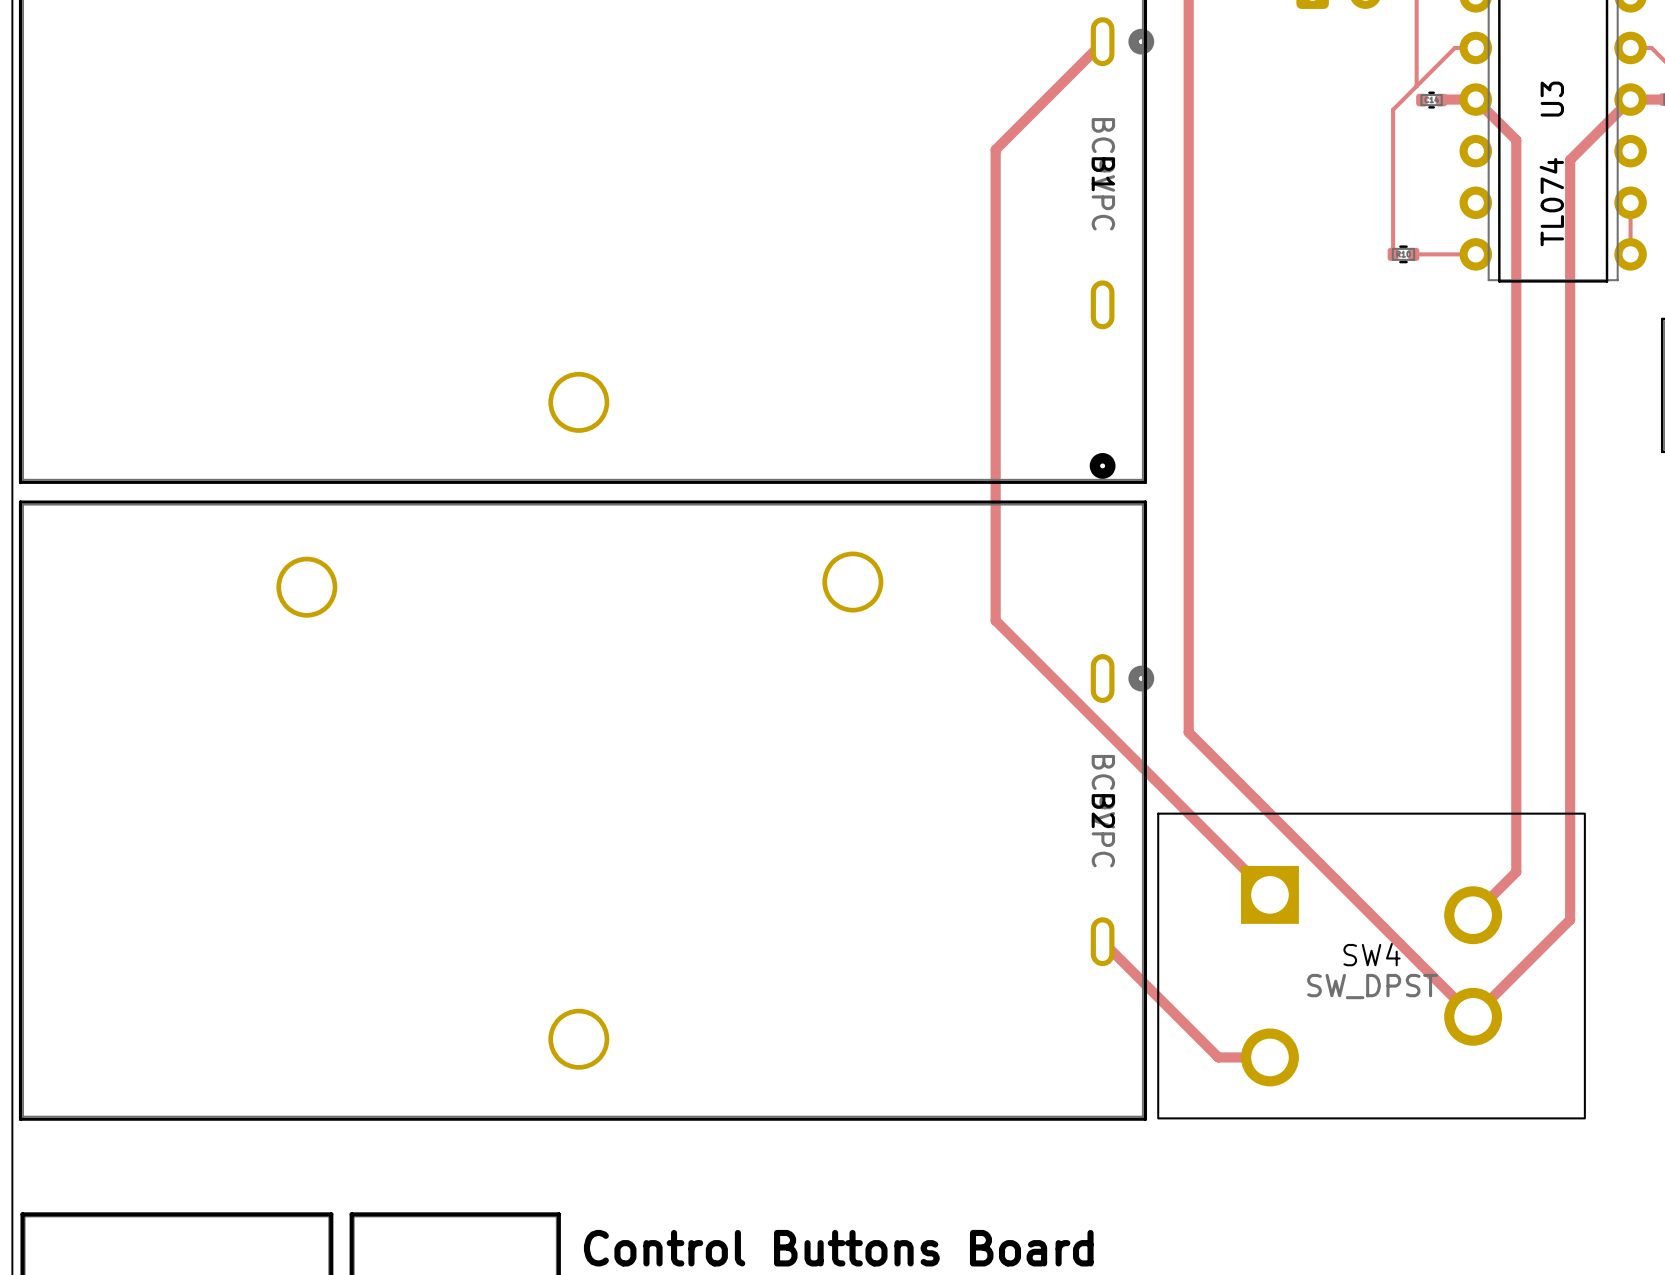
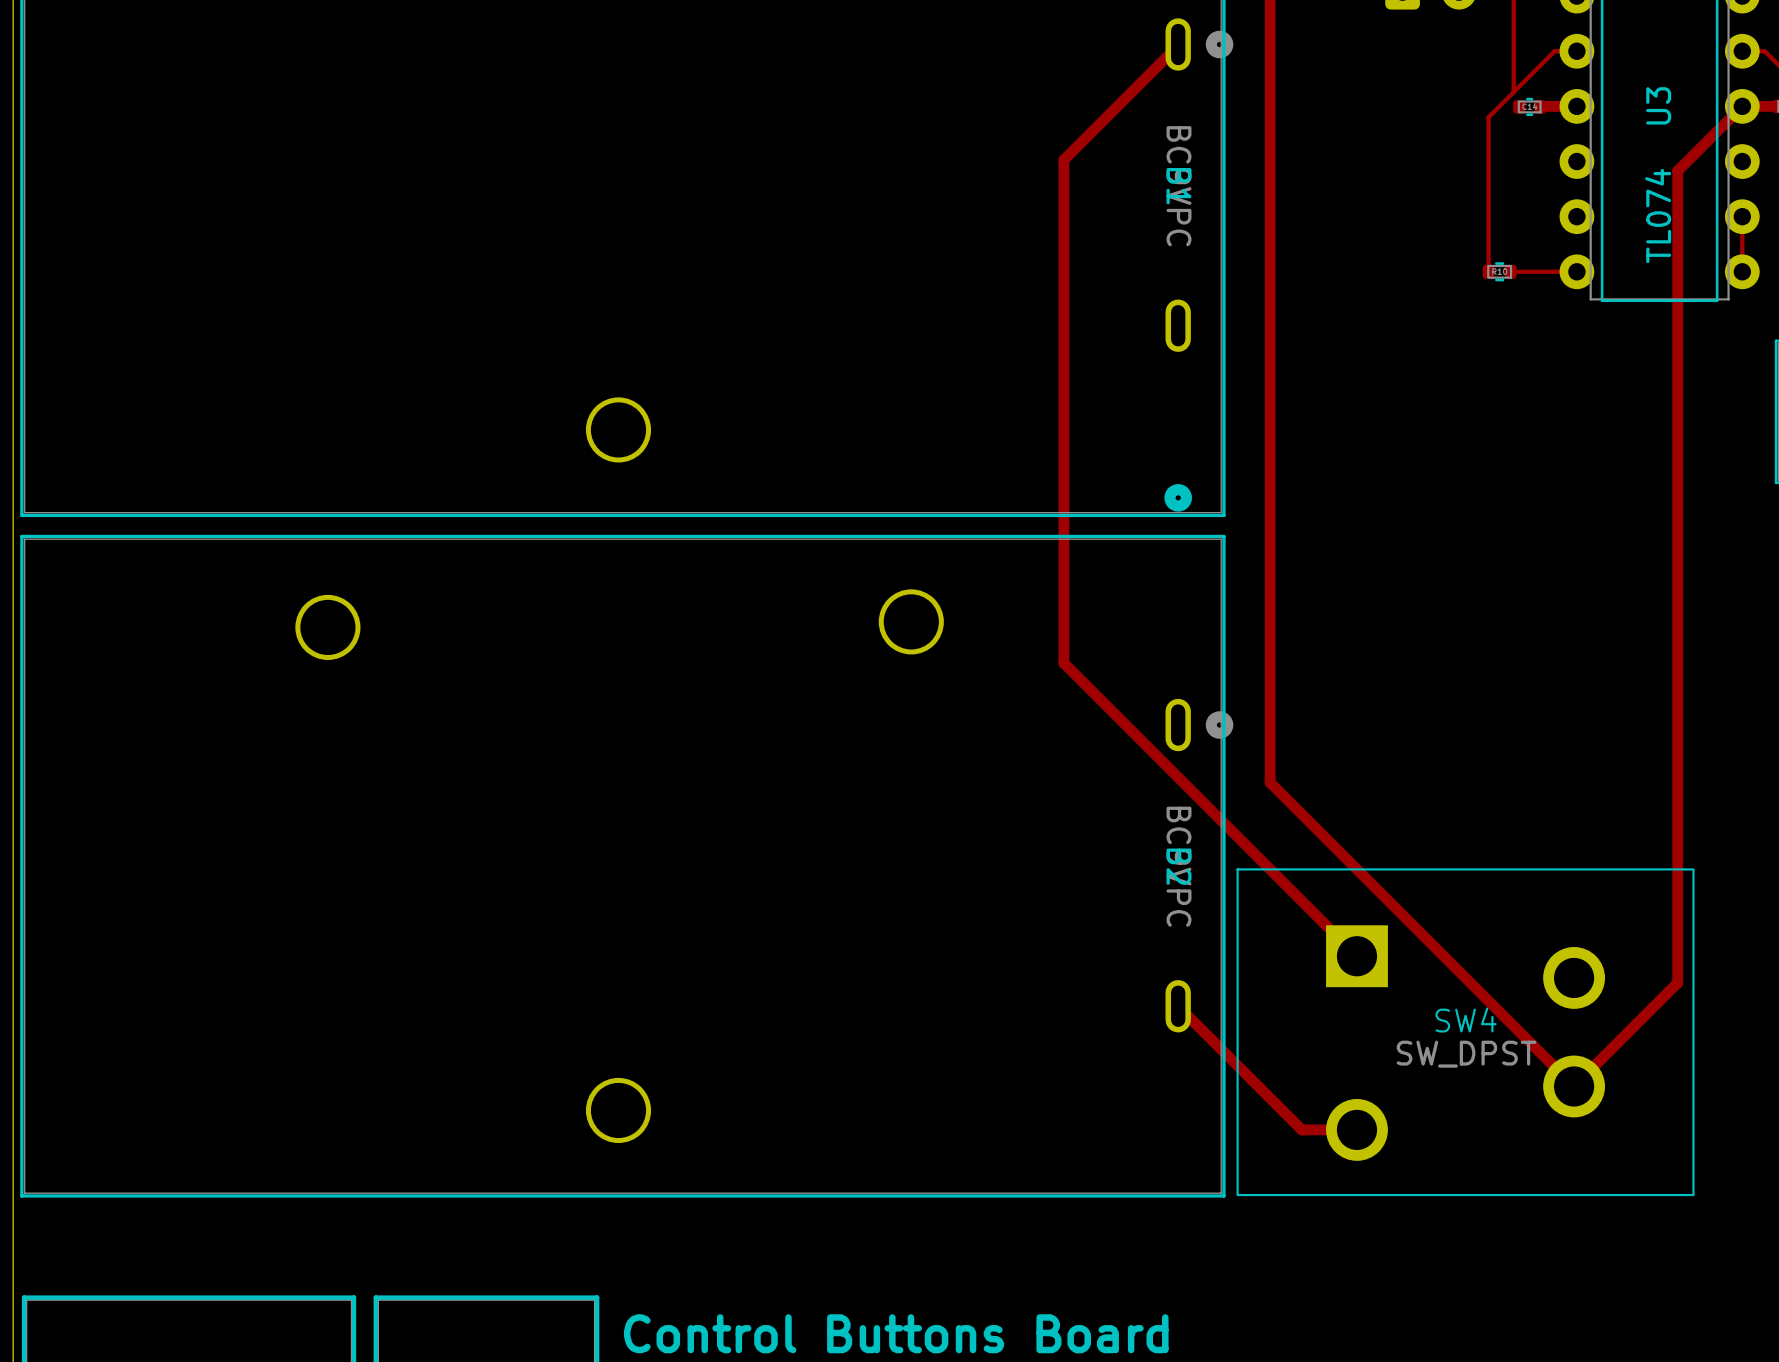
track: (1475, 99) (1516, 140) (1516, 872) (1473, 915) -> none

